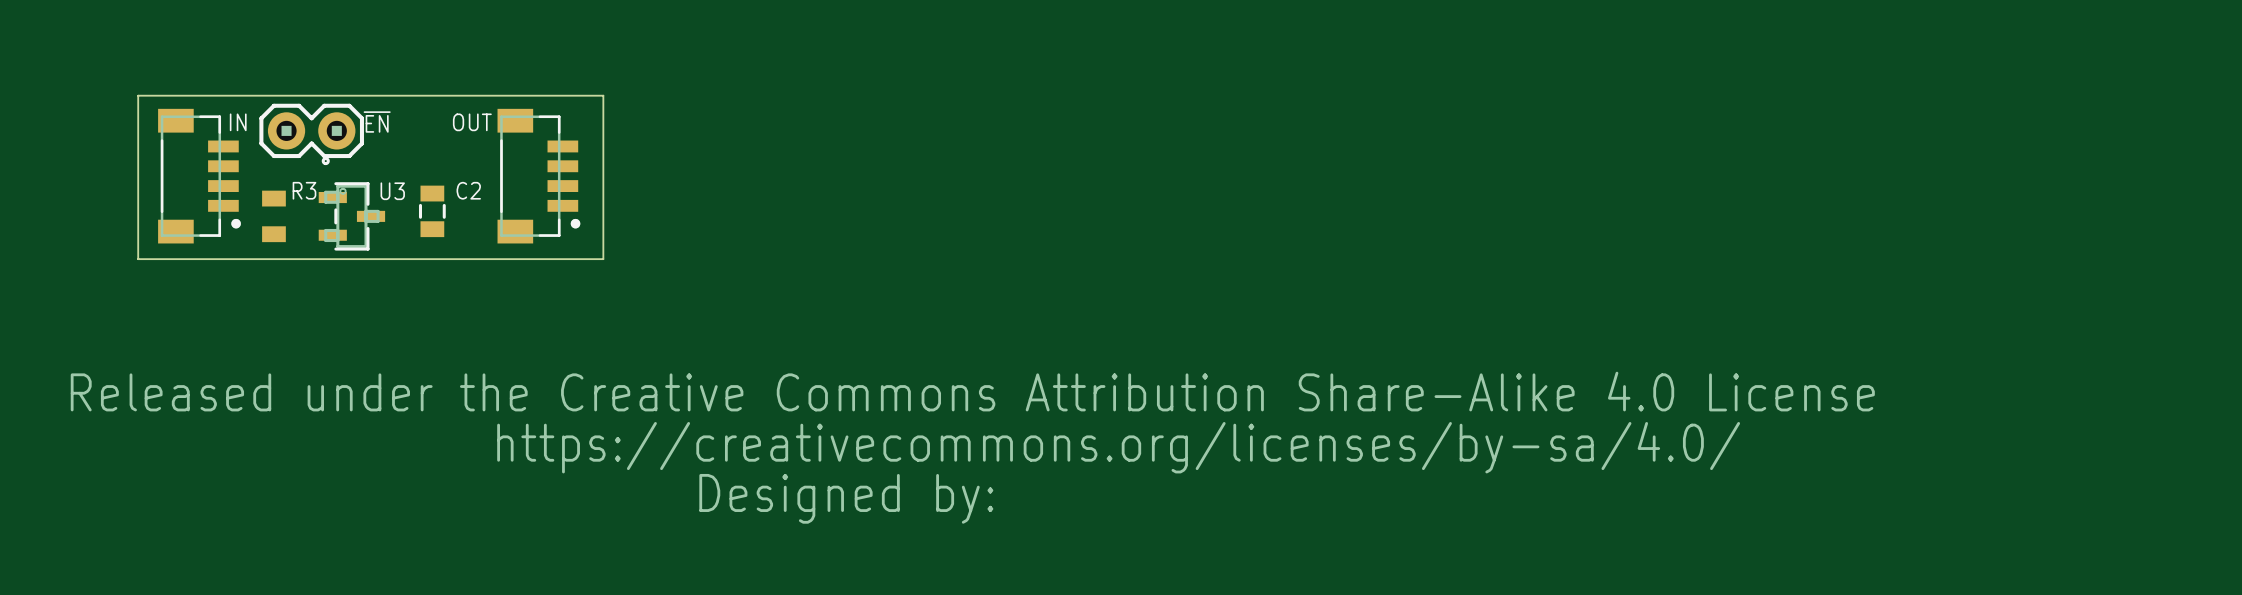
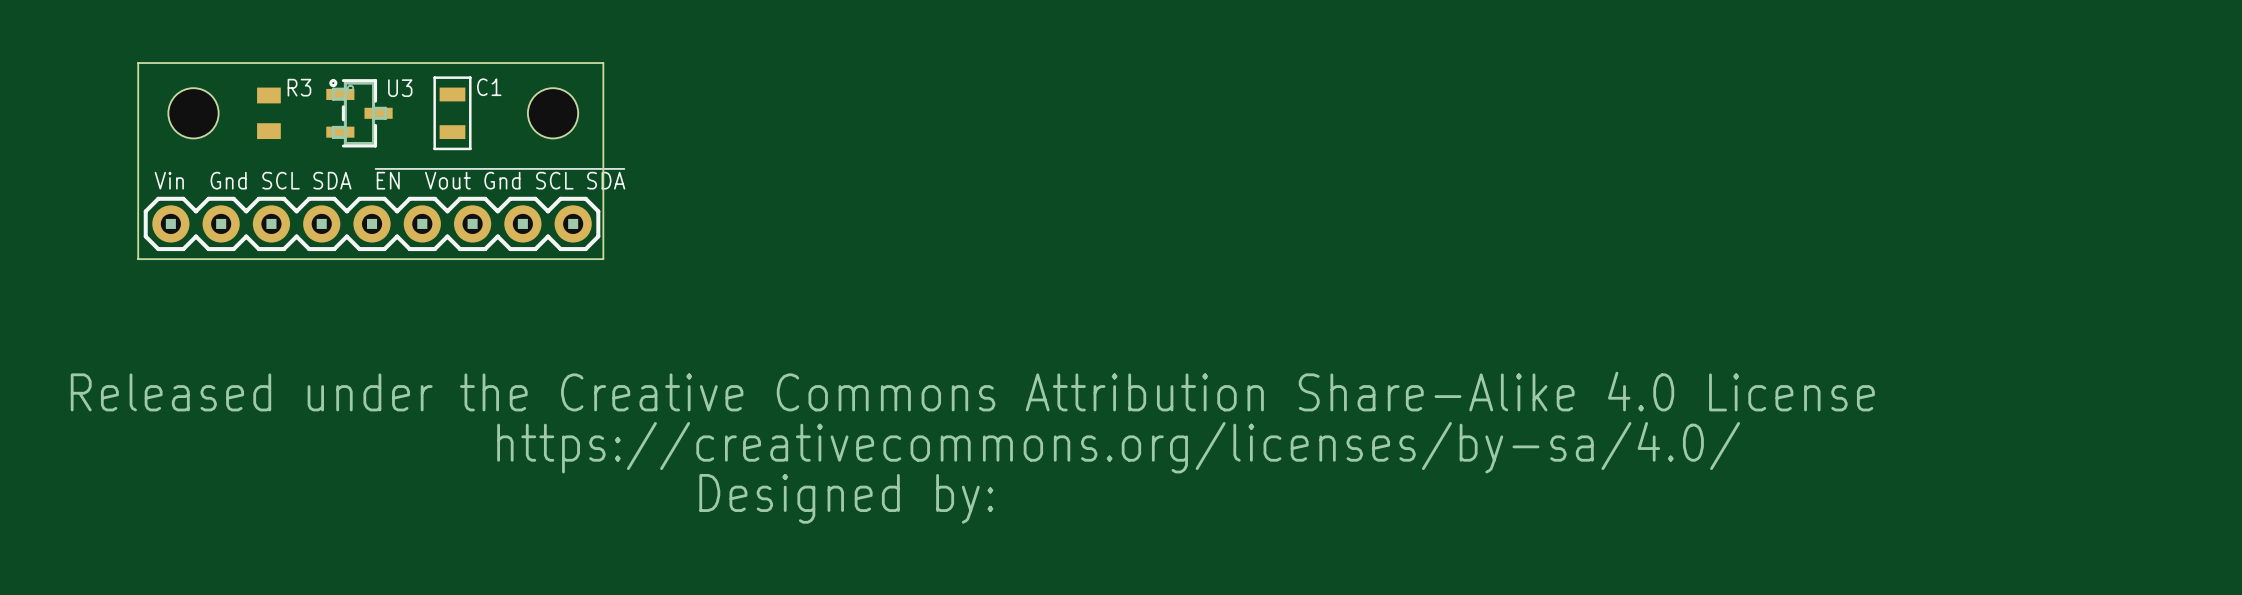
board edge: (138, 95) (603, 95) -> (138, 95) (138, 63) (603, 63) (603, 95)
part: none -> (193, 113)
C1: none -> (452, 113)
part: none -> (553, 113)
~{EN}: (311, 130) -> none
U3 footprint: [318, 157, 386, 251] -> [326, 79, 393, 148]
IN: (199, 176) -> none
OUT: (538, 176) -> none
text: none -> Vin Gnd SCL SDA ~{EN Vout Gnd SCL SDA} (389, 178)
C2: (432, 211) -> none
R3 position: (273, 216) -> (268, 113)
part: none -> (372, 223)

